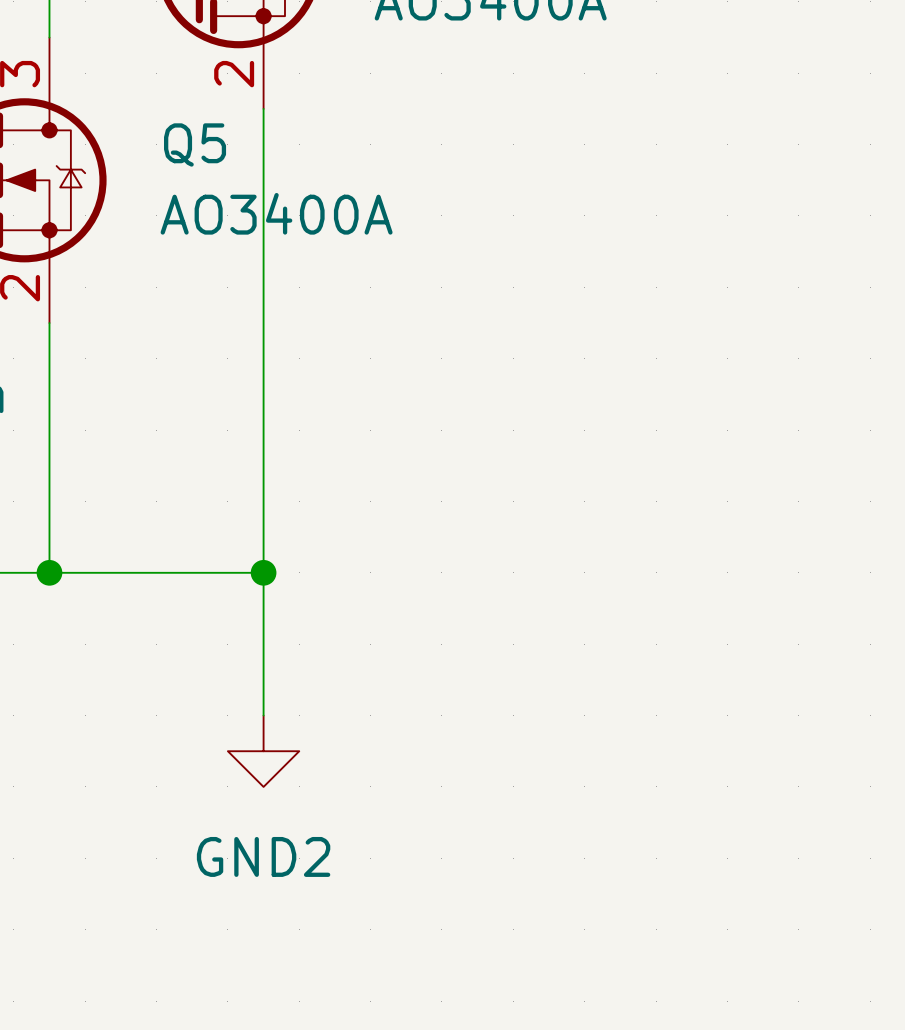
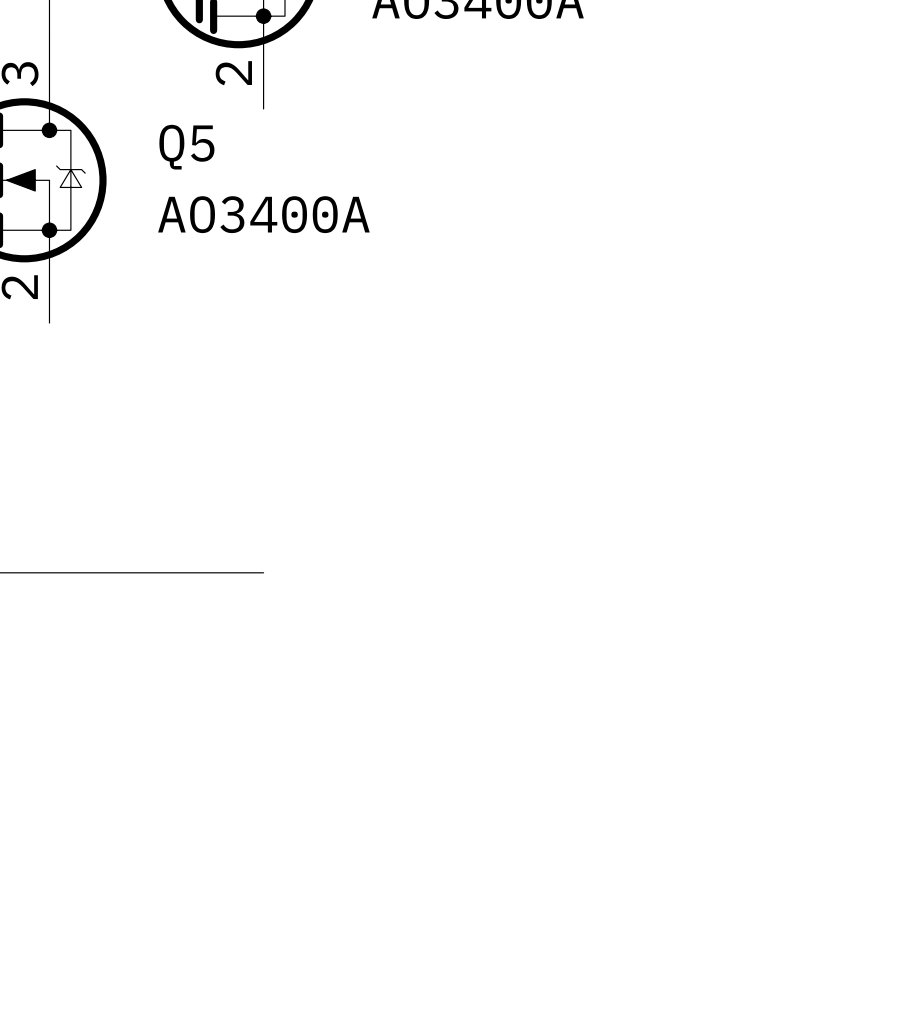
wire: (263, 108) (263, 715) -> none
wire: (49, 323) (49, 572) -> none
junction: (49, 572) -> none
junction: (263, 572) -> none
power symbol: GND2 (263, 751) -> none

